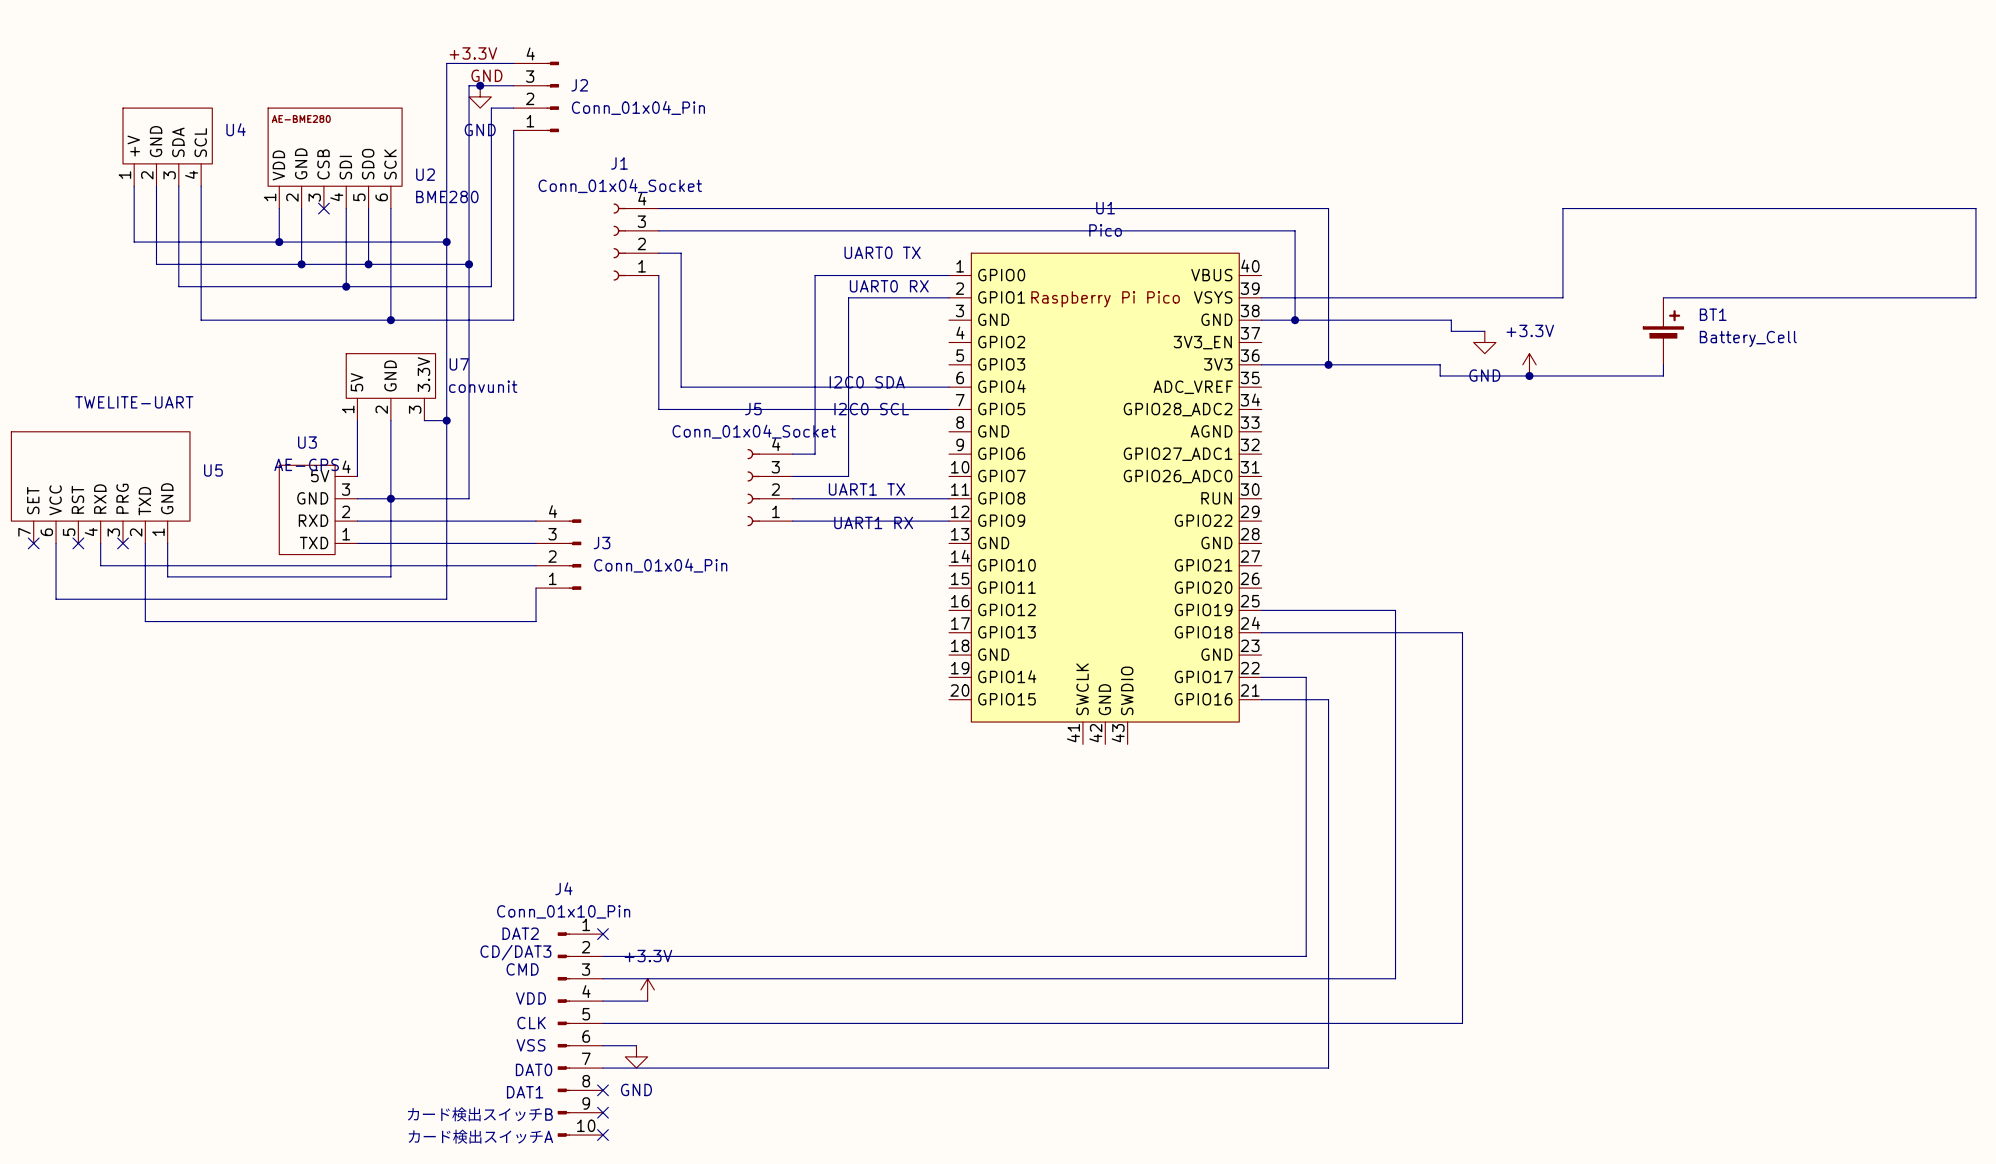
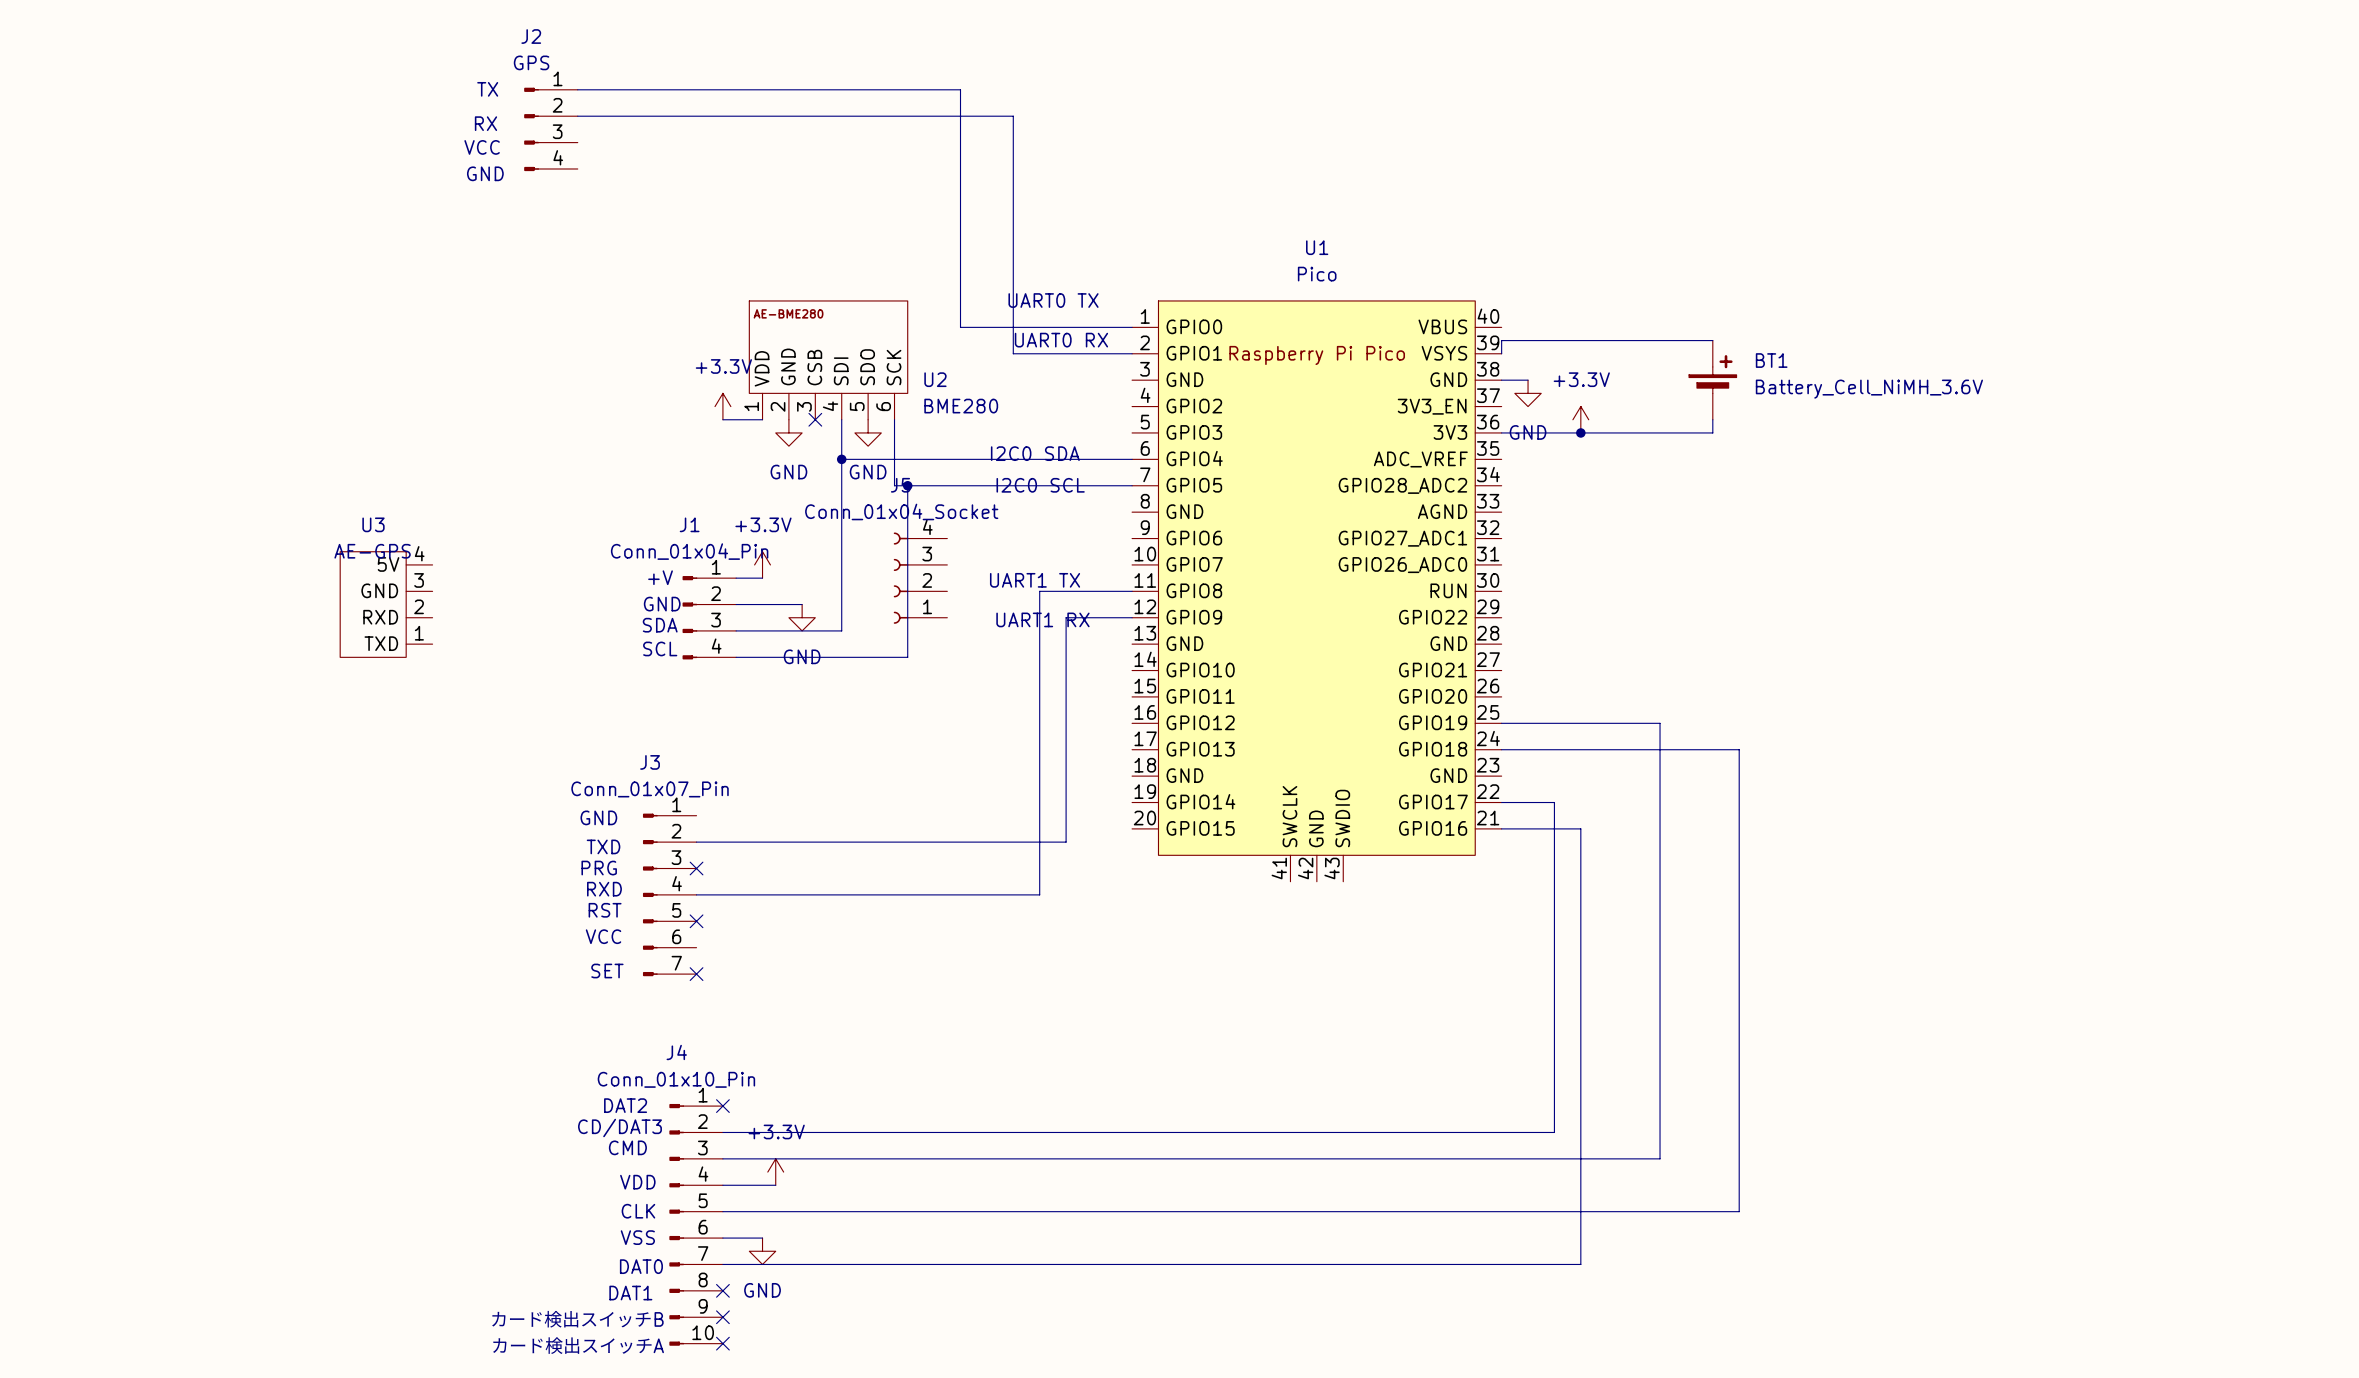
label: +3.3V (473, 53) -> none
wire: (513, 63) (446, 63) (446, 599) (56, 599) (56, 543) -> none
text: none -> TX (487, 89)
label: GND (486, 75) -> none
junction: (480, 85) -> none
wire: (513, 85) (469, 85) (469, 498) (357, 498) -> none
J2 name position: J2 (579, 85) -> J2 (531, 36)
power symbol: GND (480, 96) -> none
J2 position: (536, 96) -> (550, 129)
J2 rotation: 0° (552, 96) -> 180° (531, 129)
text: none -> RX (485, 123)
J2 value: Conn_01x04_Pin (638, 107) -> GPS (531, 62)
wire: (513, 108) (491, 108) (491, 286) (178, 286) (178, 186) -> none
text: none -> VCC (482, 147)
wire: (513, 130) (513, 320) (201, 320) (201, 186) -> none
text: none -> GND (485, 173)
U4: (167, 147) -> none
wire: (134, 186) (134, 242) (446, 242) -> none
wire: (156, 186) (156, 264) (469, 264) -> none
U2 position: (279, 186) -> (762, 393)
J1 value: Conn_01x04_Socket (620, 186) -> Conn_01x04_Pin (689, 551)
J1 symbol: [613, 203, 659, 281] -> [682, 576, 737, 660]
wire: (279, 208) (279, 242) -> none
wire: (301, 208) (301, 264) -> none
no-connect mark: (323, 208) -> none
wire: (346, 208) (346, 286) -> none
wire: (368, 208) (368, 264) -> none
wire: (390, 208) (390, 320) -> none
wire: (658, 208) (1328, 208) (1328, 364) -> none
wire: (658, 230) (1295, 230) (1295, 320) -> none
junction: (279, 242) -> none
junction: (446, 242) -> none
wire: (658, 253) (681, 253) (681, 387) (703, 387) -> none
junction: (301, 264) -> none
junction: (368, 264) -> none
junction: (469, 264) -> none
wire: (658, 275) (658, 409) (748, 409) -> (894, 419) (894, 485)
wire: (815, 275) (815, 454) (792, 454) -> (973, 327) (960, 327) (960, 89) (577, 89)
junction: (346, 286) -> none
wire: (848, 297) (848, 476) (792, 476) -> (1013, 353) (1013, 116) (577, 116)
wire: (1261, 297) (1562, 297) (1562, 208) (1975, 208) (1975, 297) (1663, 297) -> (1501, 353) (1501, 340) (1712, 340)
junction: (390, 320) -> none
wire: (1283, 320) (1451, 320) (1451, 331) (1484, 331) -> none
junction: (1295, 320) -> none
BT1 position: (1663, 331) -> (1712, 380)
BT1 value: Battery_Cell (1748, 338) -> Battery_Cell_NiMH_3.6V (1869, 389)
power symbol: none -> +3.3V (722, 406)
power symbol position: GND (1484, 342) -> GND (1528, 393)
wire: none -> (722, 419) (762, 419)
no-connect mark: none -> (815, 419)
wire: none -> (841, 419) (841, 630) (736, 630)
power symbol: none -> GND (788, 432)
power symbol: none -> GND (868, 432)
wire: (1440, 364) (1440, 375) (1663, 375) (1663, 364) -> (1712, 432) (1712, 419)
power symbol position: +3.3V (1529, 364) -> +3.3V (1580, 419)
junction: (1529, 375) -> none
U7: convunit (390, 387) -> none
junction: none -> (841, 459)
wire: none -> (907, 485) (907, 657) (736, 657)
junction: none -> (907, 485)
wire: (357, 420) (357, 476) -> none
wire: (390, 420) (390, 576) (167, 576) (167, 543) -> none
wire: (424, 420) (446, 420) -> (736, 578) (762, 578)
junction: (446, 420) -> none
power symbol: none -> +3.3V (762, 564)
U5: TWELITE-UART (100, 487) -> none
text: none -> +V (660, 577)
junction: (390, 498) -> none
wire: (792, 498) (870, 498) -> (696, 894) (1039, 894) (1039, 591)
text: none -> GND (662, 604)
wire: none -> (736, 604) (802, 604)
J3 symbol: [536, 519, 582, 590] -> [642, 813, 697, 977]
wire: (357, 521) (536, 521) -> none
power symbol: none -> GND (802, 617)
wire: (792, 521) (893, 521) -> (696, 842) (1066, 842) (1066, 617)
text: none -> SDA (660, 625)
no-connect mark: (33, 543) -> none
no-connect mark: (78, 543) -> none
wire: (100, 543) (100, 565) (536, 565) -> none
no-connect mark: (123, 543) -> none
wire: (145, 543) (145, 621) (536, 621) (536, 588) -> none
wire: (357, 543) (536, 543) -> none
J3 name position: J3 (602, 543) -> J3 (650, 762)
text: none -> SCL (660, 648)
J3 value: Conn_01x04_Pin (660, 565) -> Conn_01x07_Pin (650, 789)
text: none -> GND (598, 817)
text: none -> TXD (603, 846)
text: none -> PRG (599, 868)
no-connect mark: none -> (696, 868)
text: none -> RXD (604, 889)
text: none -> RST (605, 910)
no-connect mark: none -> (696, 921)
text: none -> VCC (603, 936)
text: none -> SET (607, 971)
no-connect mark: none -> (696, 974)

